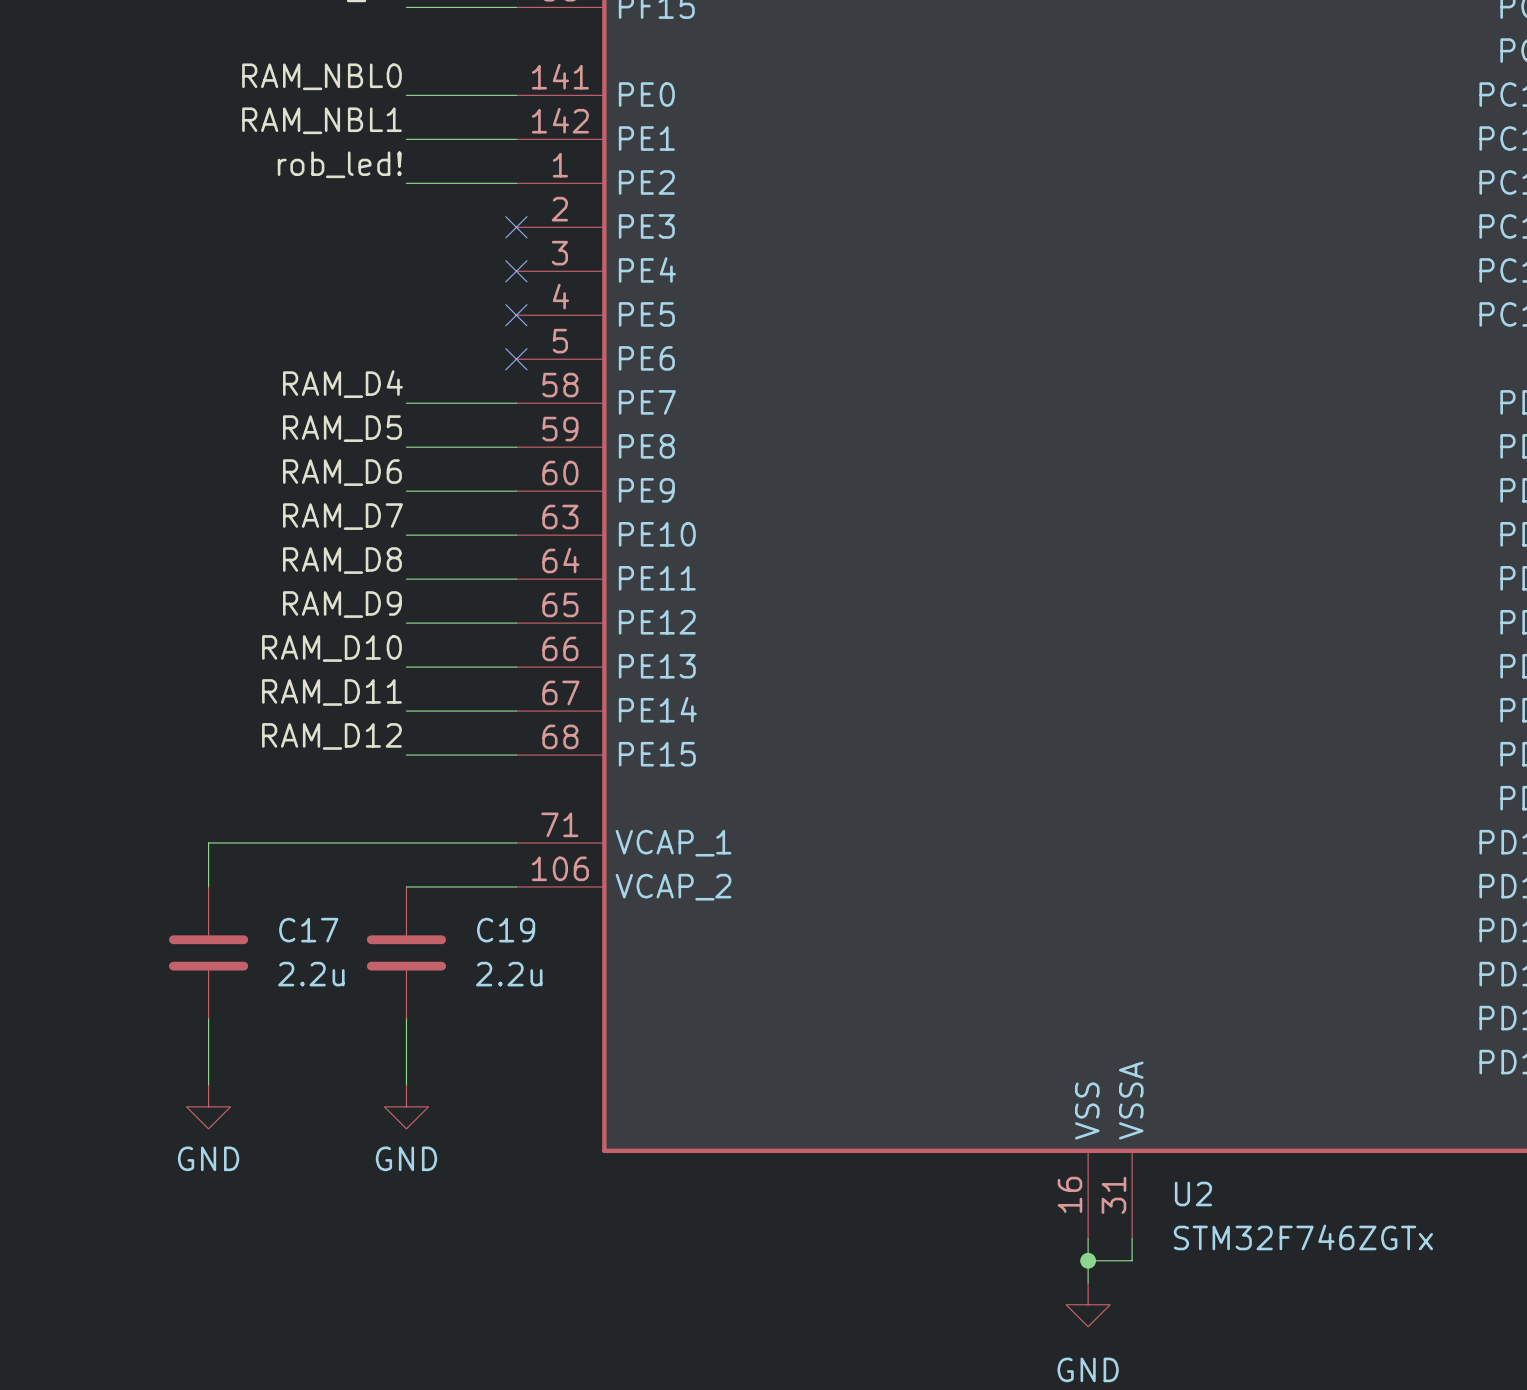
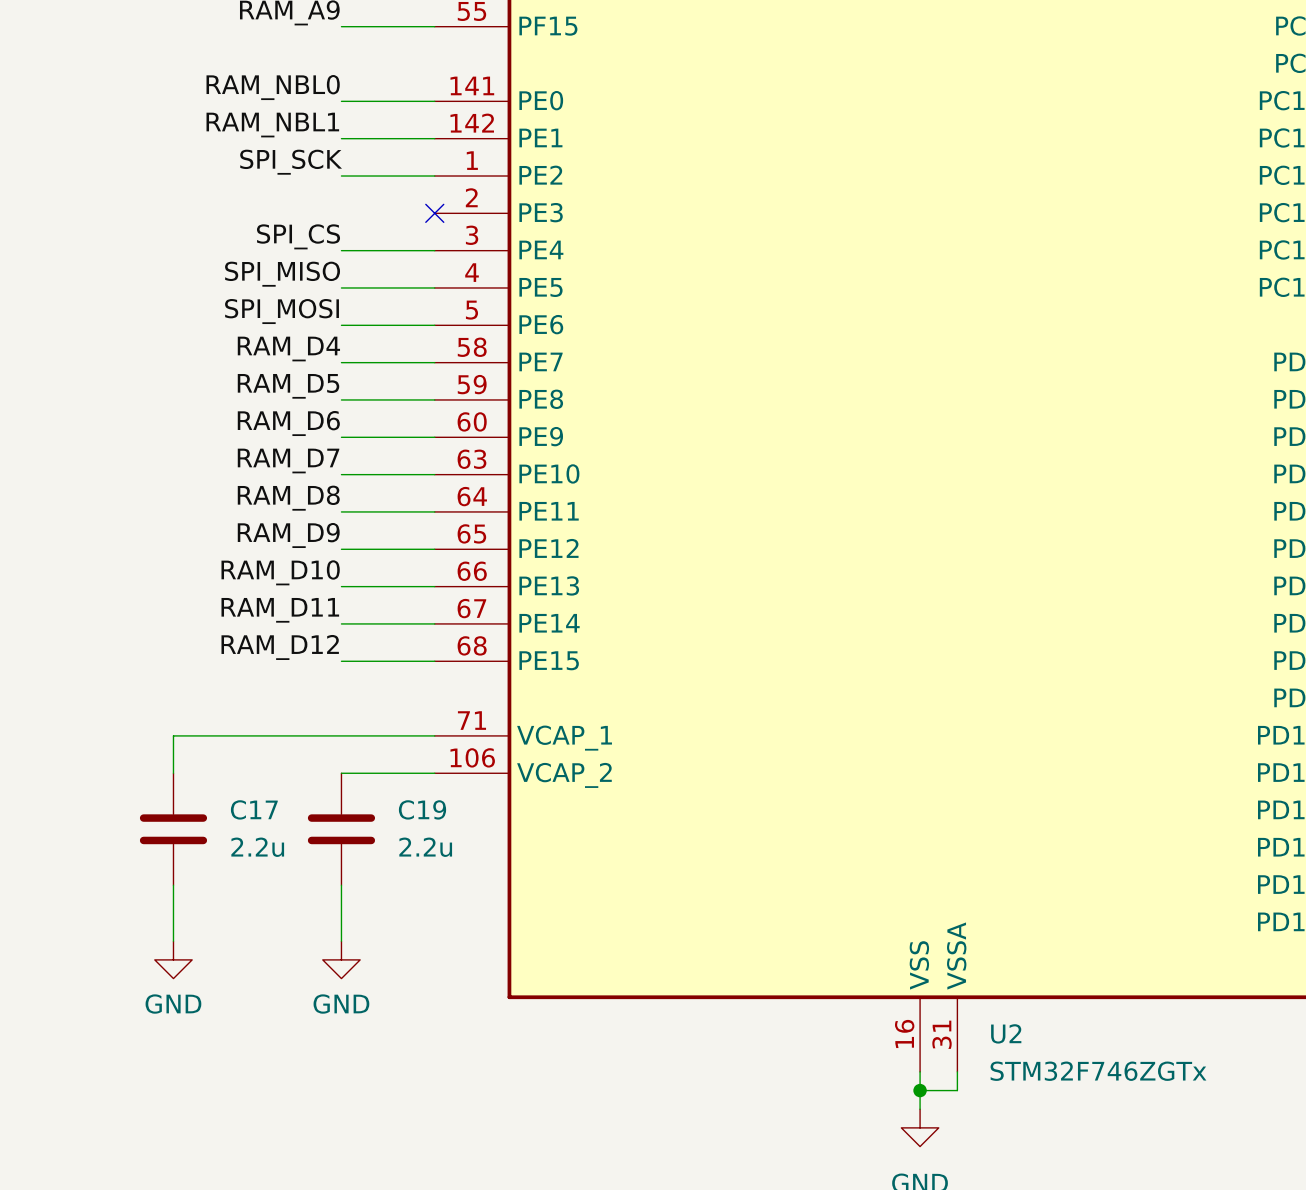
label: rob_led! (339, 164) -> SPI_SCK (291, 162)
label: none -> SPI_CS (298, 236)
wire: none -> (341, 250) (434, 250)
no-connect mark: (516, 271) -> none
label: none -> SPI_MISO (282, 274)
wire: none -> (341, 287) (434, 287)
no-connect mark: (516, 315) -> none
label: none -> SPI_MOSI (282, 311)
wire: none -> (341, 325) (434, 325)
no-connect mark: (516, 359) -> none

